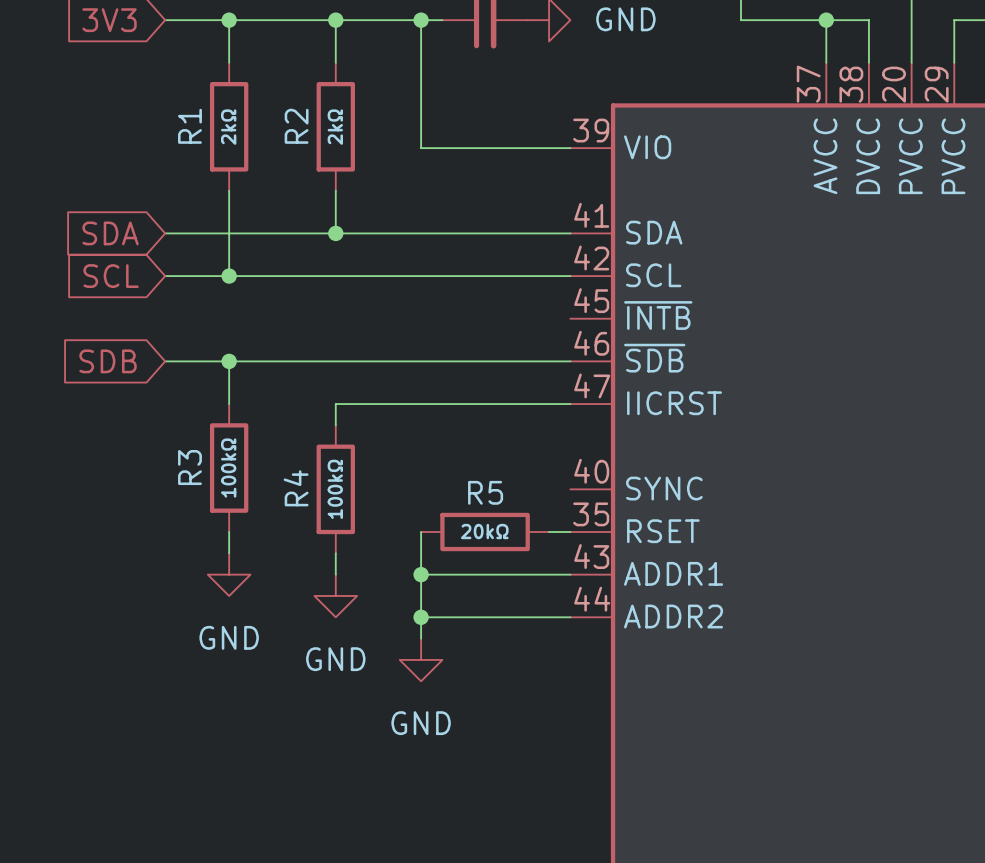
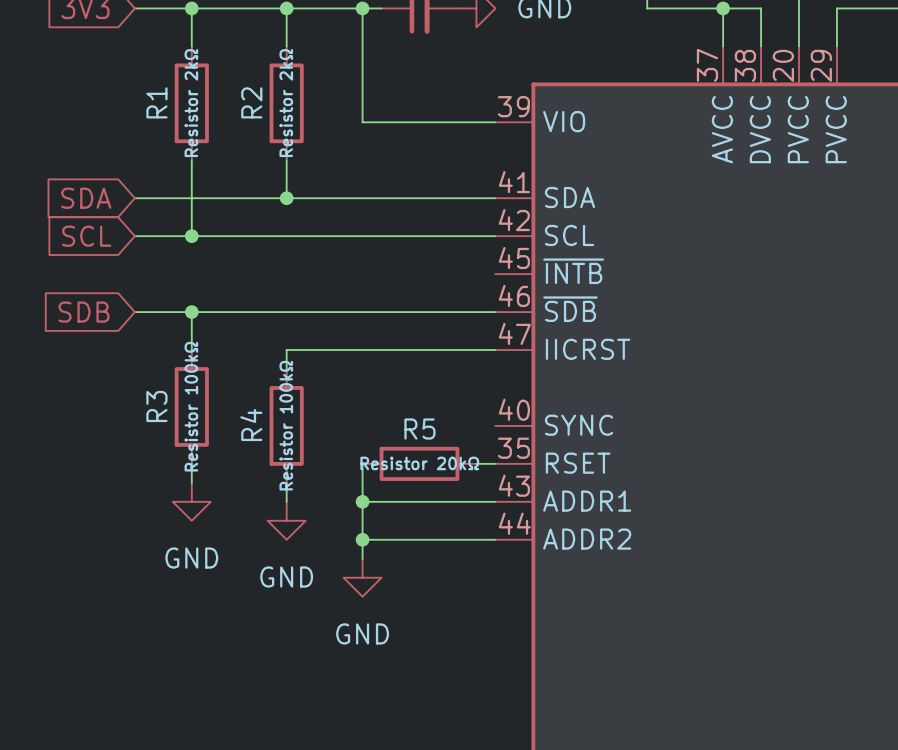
R1 value: 2kΩ (228, 127) -> Resistor 2kΩ (191, 103)
R2 value: 2kΩ (335, 127) -> Resistor 2kΩ (286, 103)
R3 value: 100kΩ (228, 468) -> Resistor 100kΩ (191, 406)
R4 value: 100kΩ (335, 489) -> Resistor 100kΩ (286, 425)
R5 value: 20kΩ (484, 531) -> Resistor 20kΩ (419, 463)

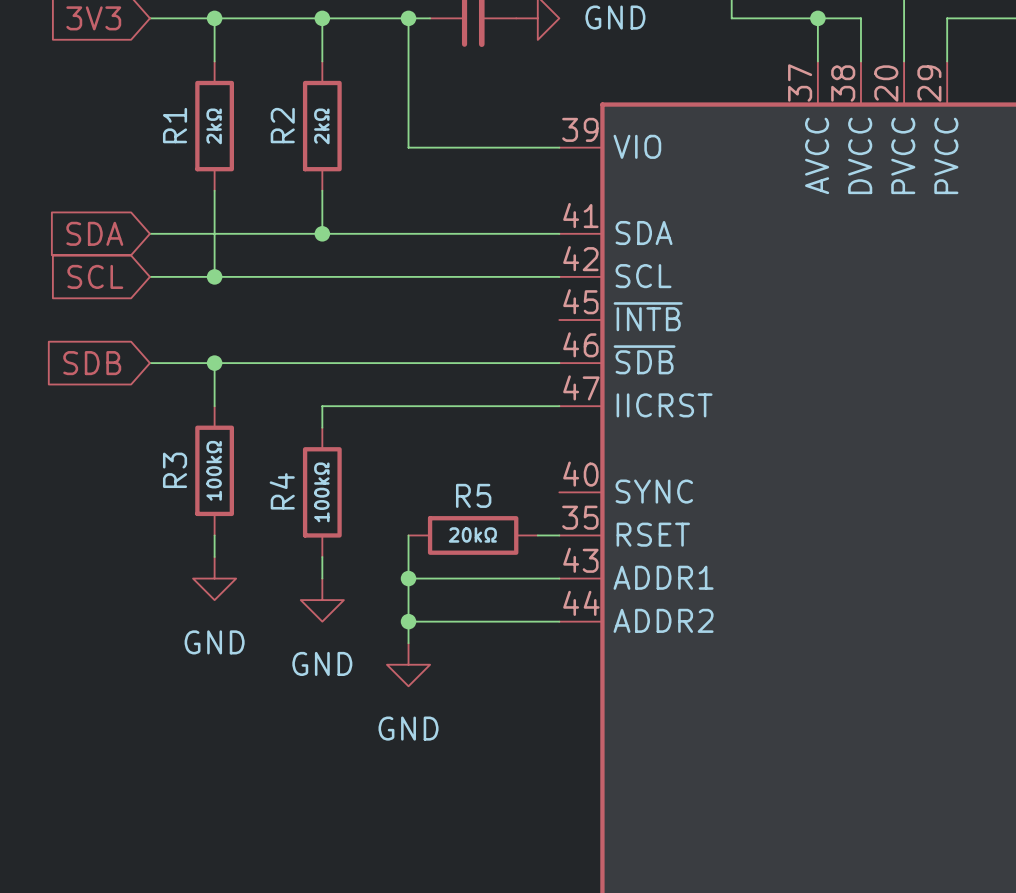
R1 value: Resistor 2kΩ (191, 103) -> 2kΩ (214, 126)
R2 value: Resistor 2kΩ (286, 103) -> 2kΩ (321, 126)
R3 value: Resistor 100kΩ (191, 406) -> 100kΩ (214, 470)
R4 value: Resistor 100kΩ (286, 425) -> 100kΩ (321, 492)
R5 value: Resistor 20kΩ (419, 463) -> 20kΩ (472, 534)

